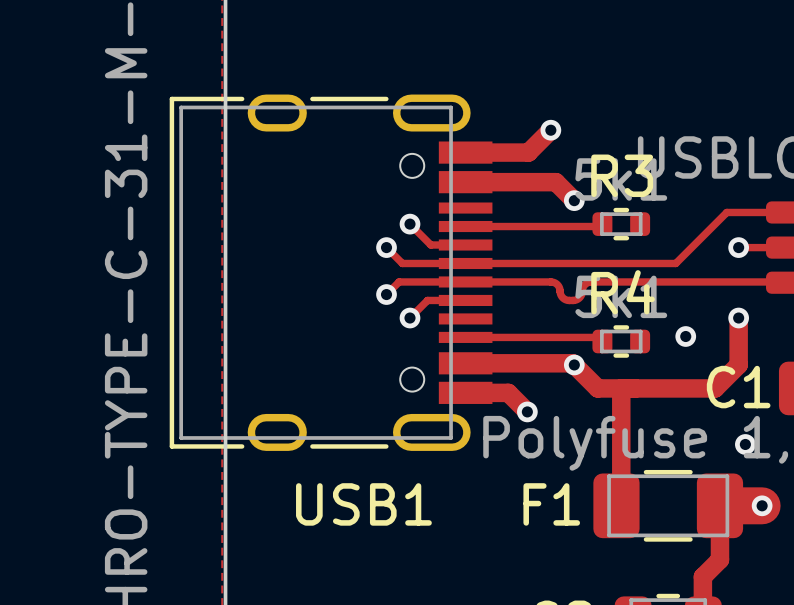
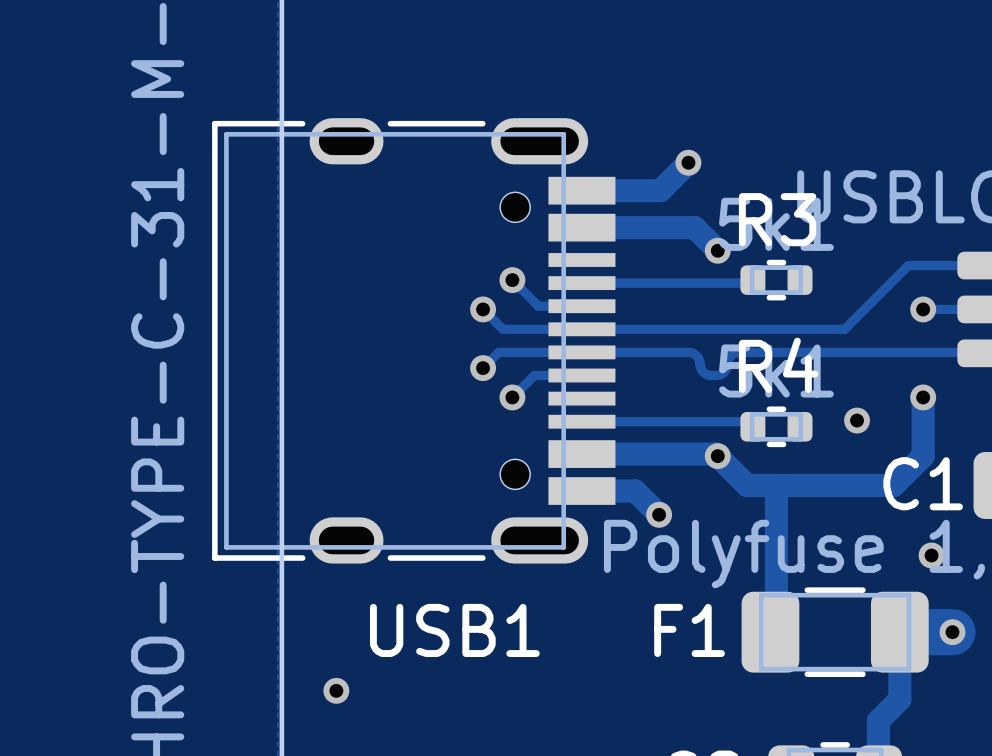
via: none -> (336, 690)

